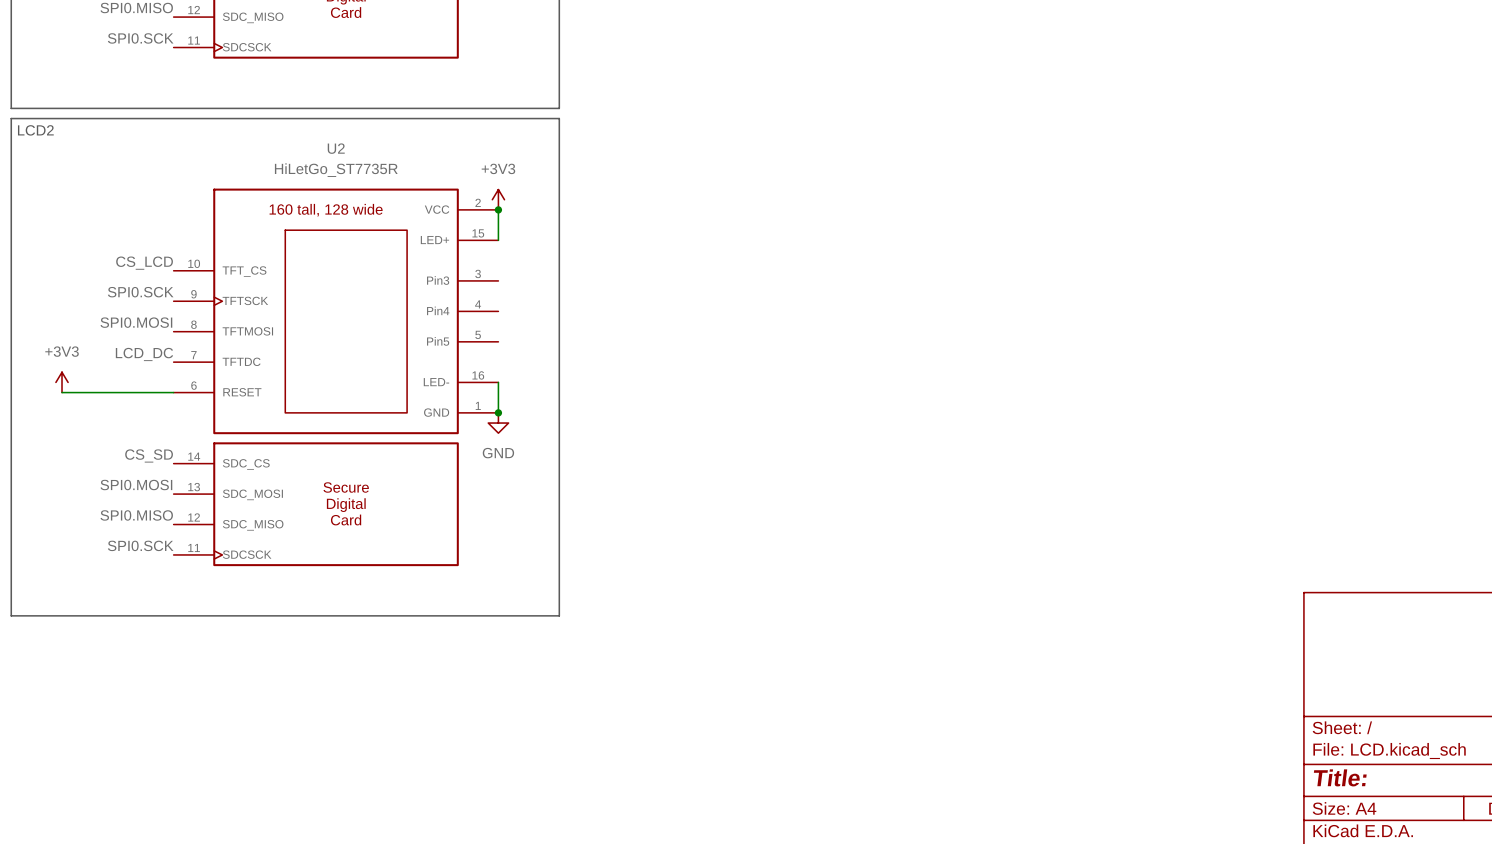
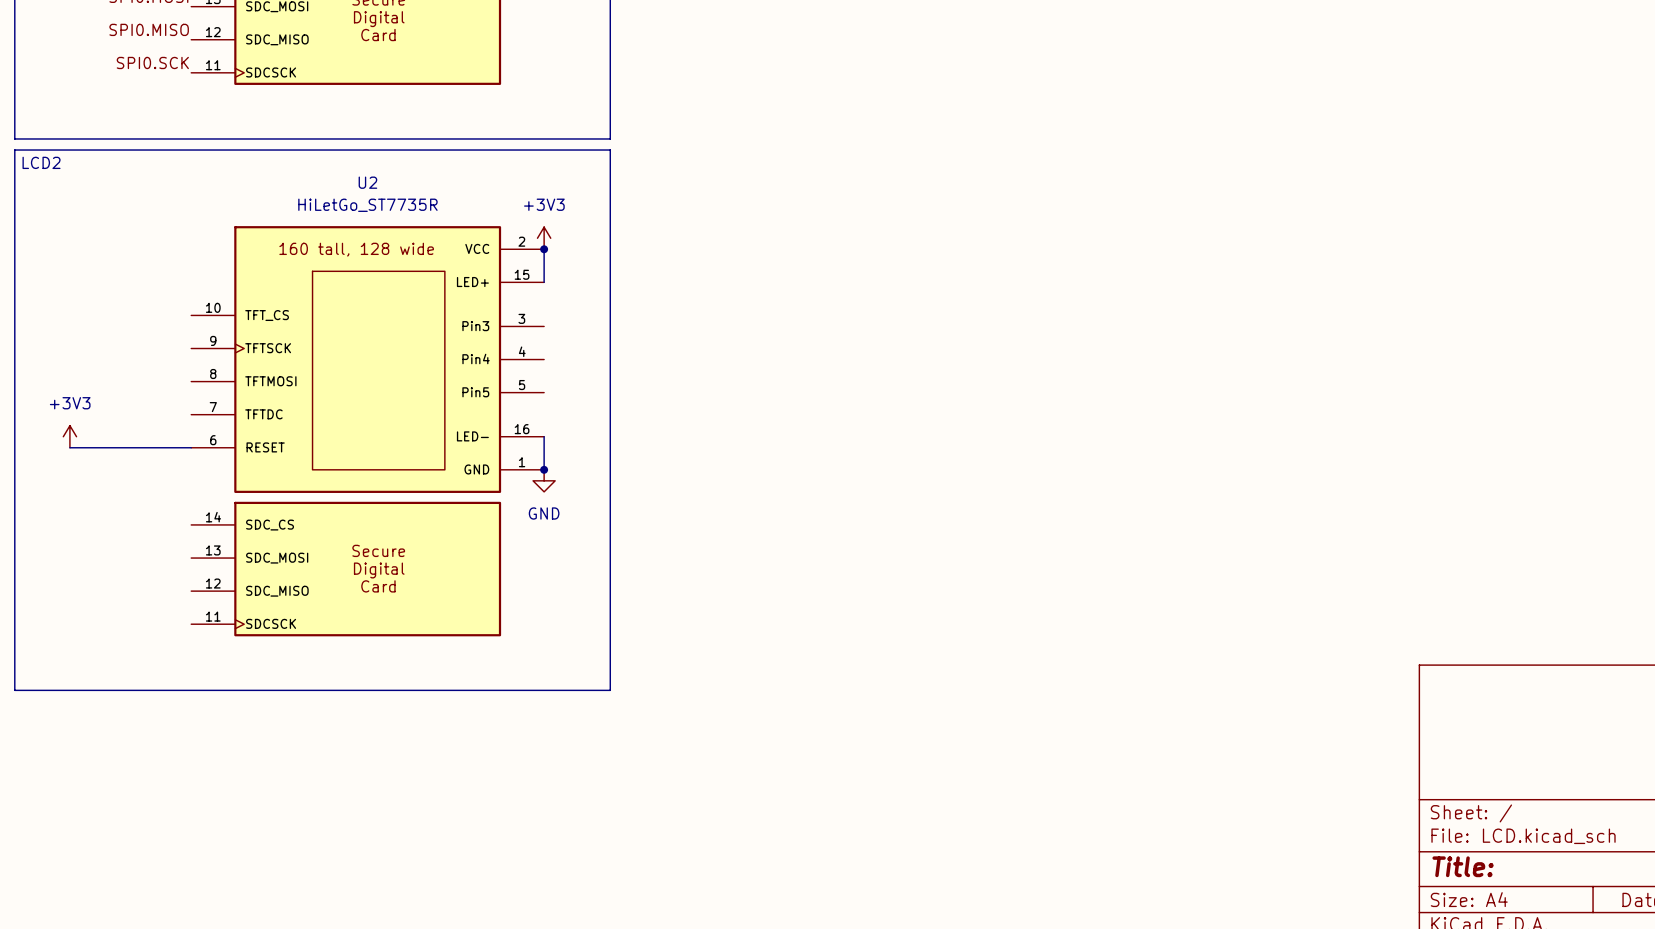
label: CS_LCD (144, 263) -> none
label: SPI0.SCK (140, 292) -> none
label: SPI0.MOSI (136, 322) -> none
label: LCD_DC (144, 354) -> none
label: CS_SD (149, 455) -> none
label: SPI0.MOSI (136, 485) -> none
label: SPI0.MISO (136, 515) -> none
label: SPI0.SCK (140, 545) -> none

